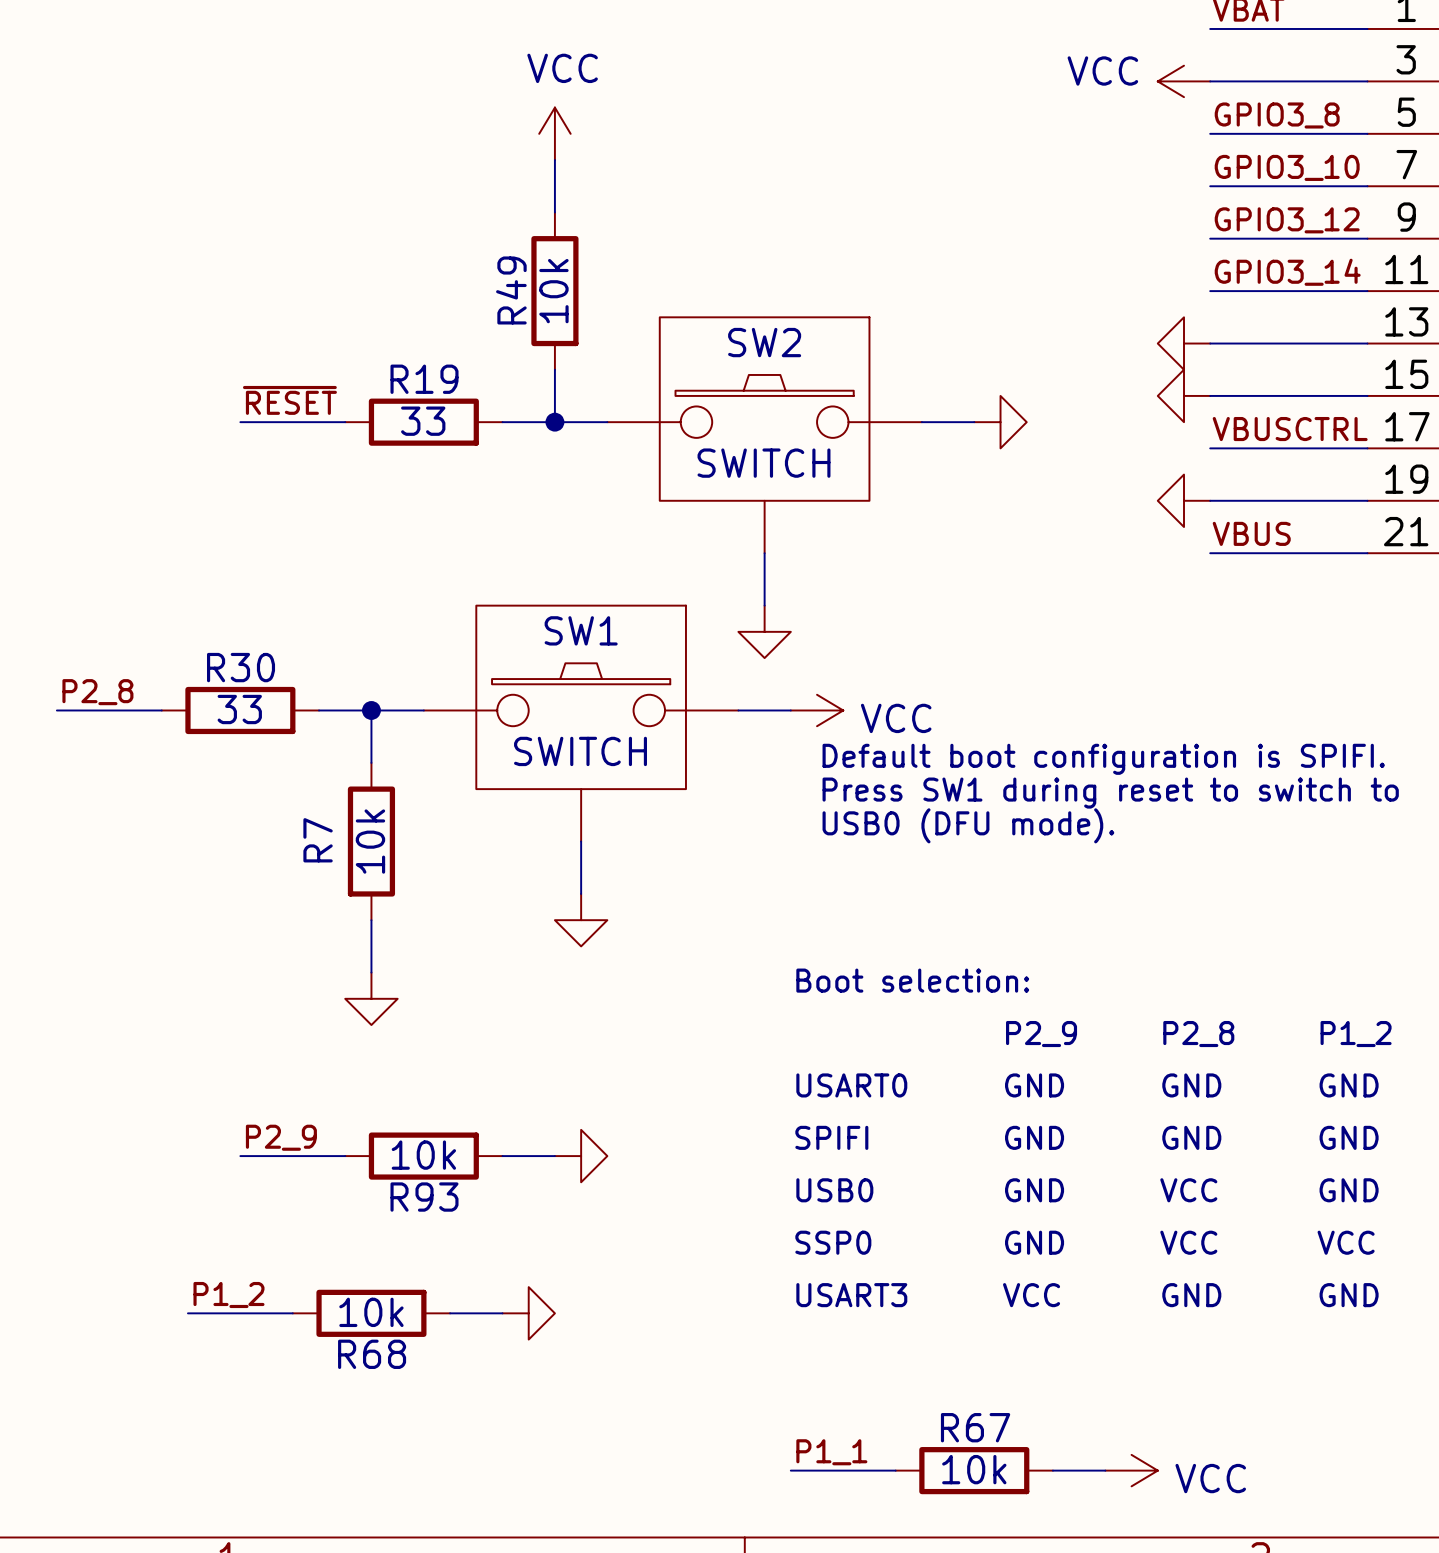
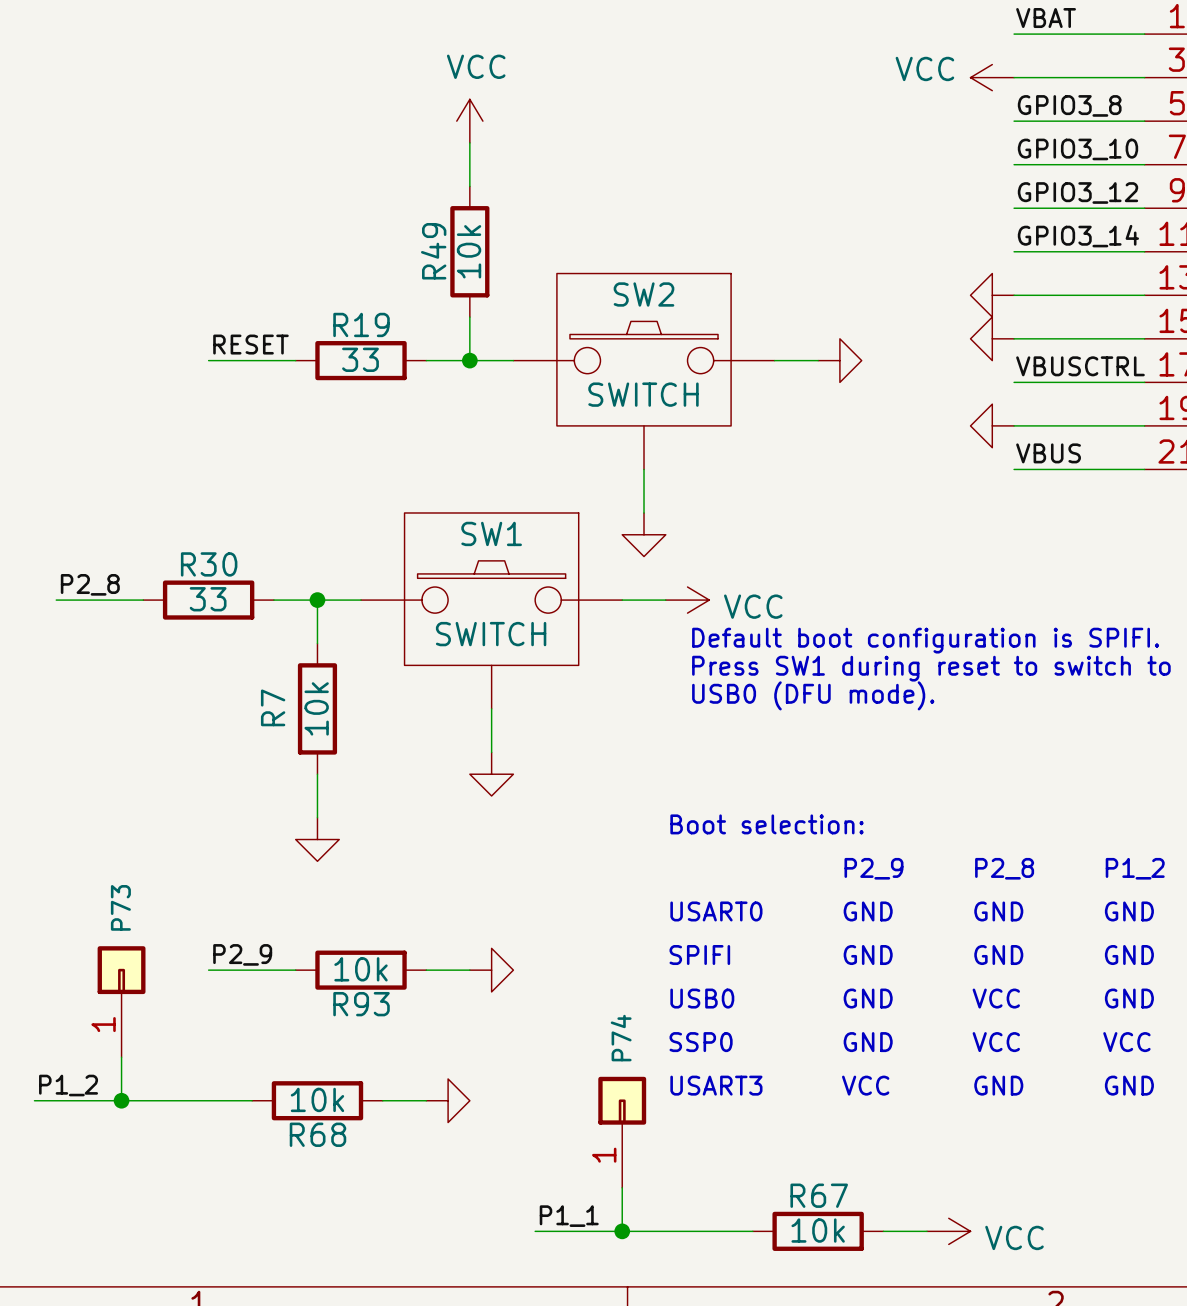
label: ~{RESET} (289, 400) -> RESET (250, 344)
P73: none -> (121, 1001)
wire: none -> (121, 1057) (121, 1100)
label position: P1_2 (228, 1295) -> P1_2 (68, 1085)
wire: none -> (34, 1100) (165, 1100)
junction: none -> (121, 1100)
P74: none -> (622, 1132)
wire: none -> (622, 1187) (622, 1231)
label position: P1_1 (831, 1452) -> P1_1 (569, 1216)
wire: none -> (535, 1231) (665, 1231)
junction: none -> (622, 1231)

